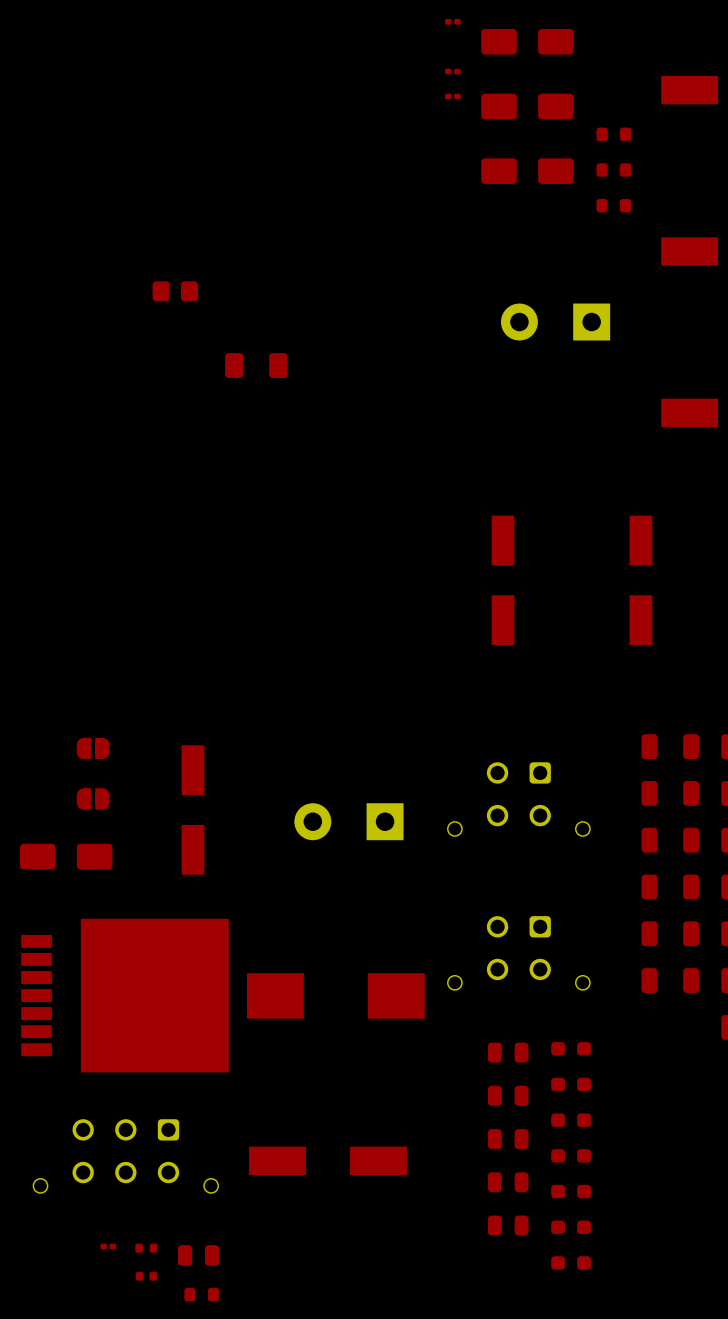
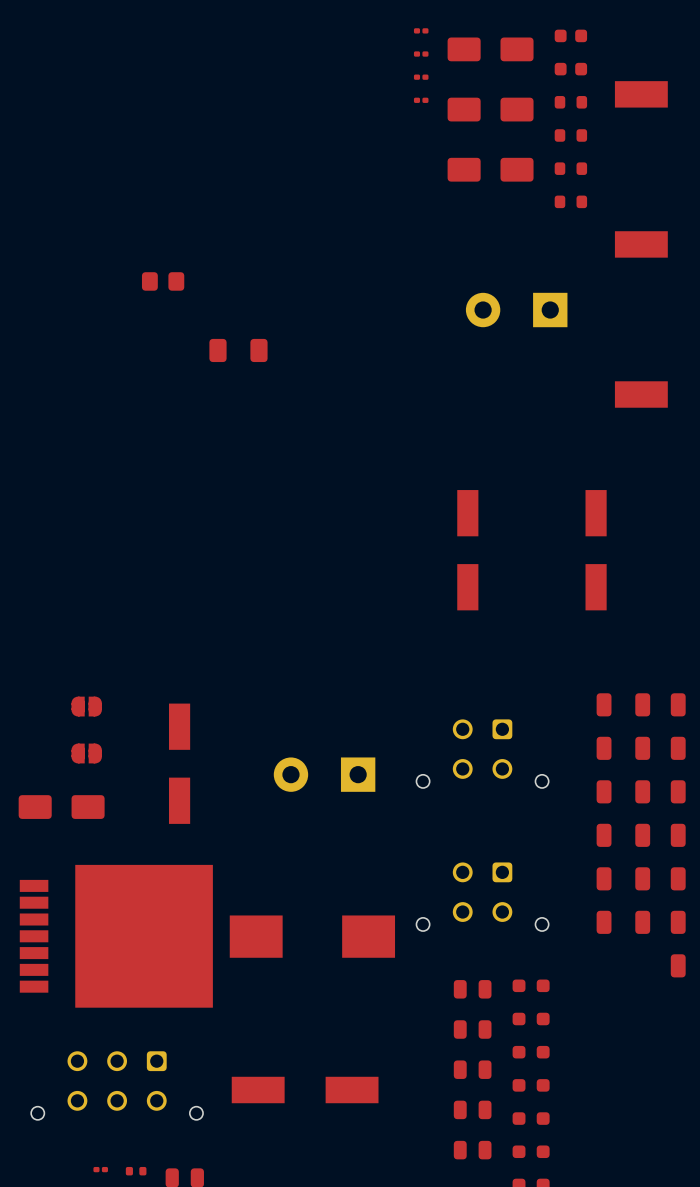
part: none -> (570, 35)
part: none -> (421, 54)
part: none -> (570, 69)
part: none -> (570, 102)

